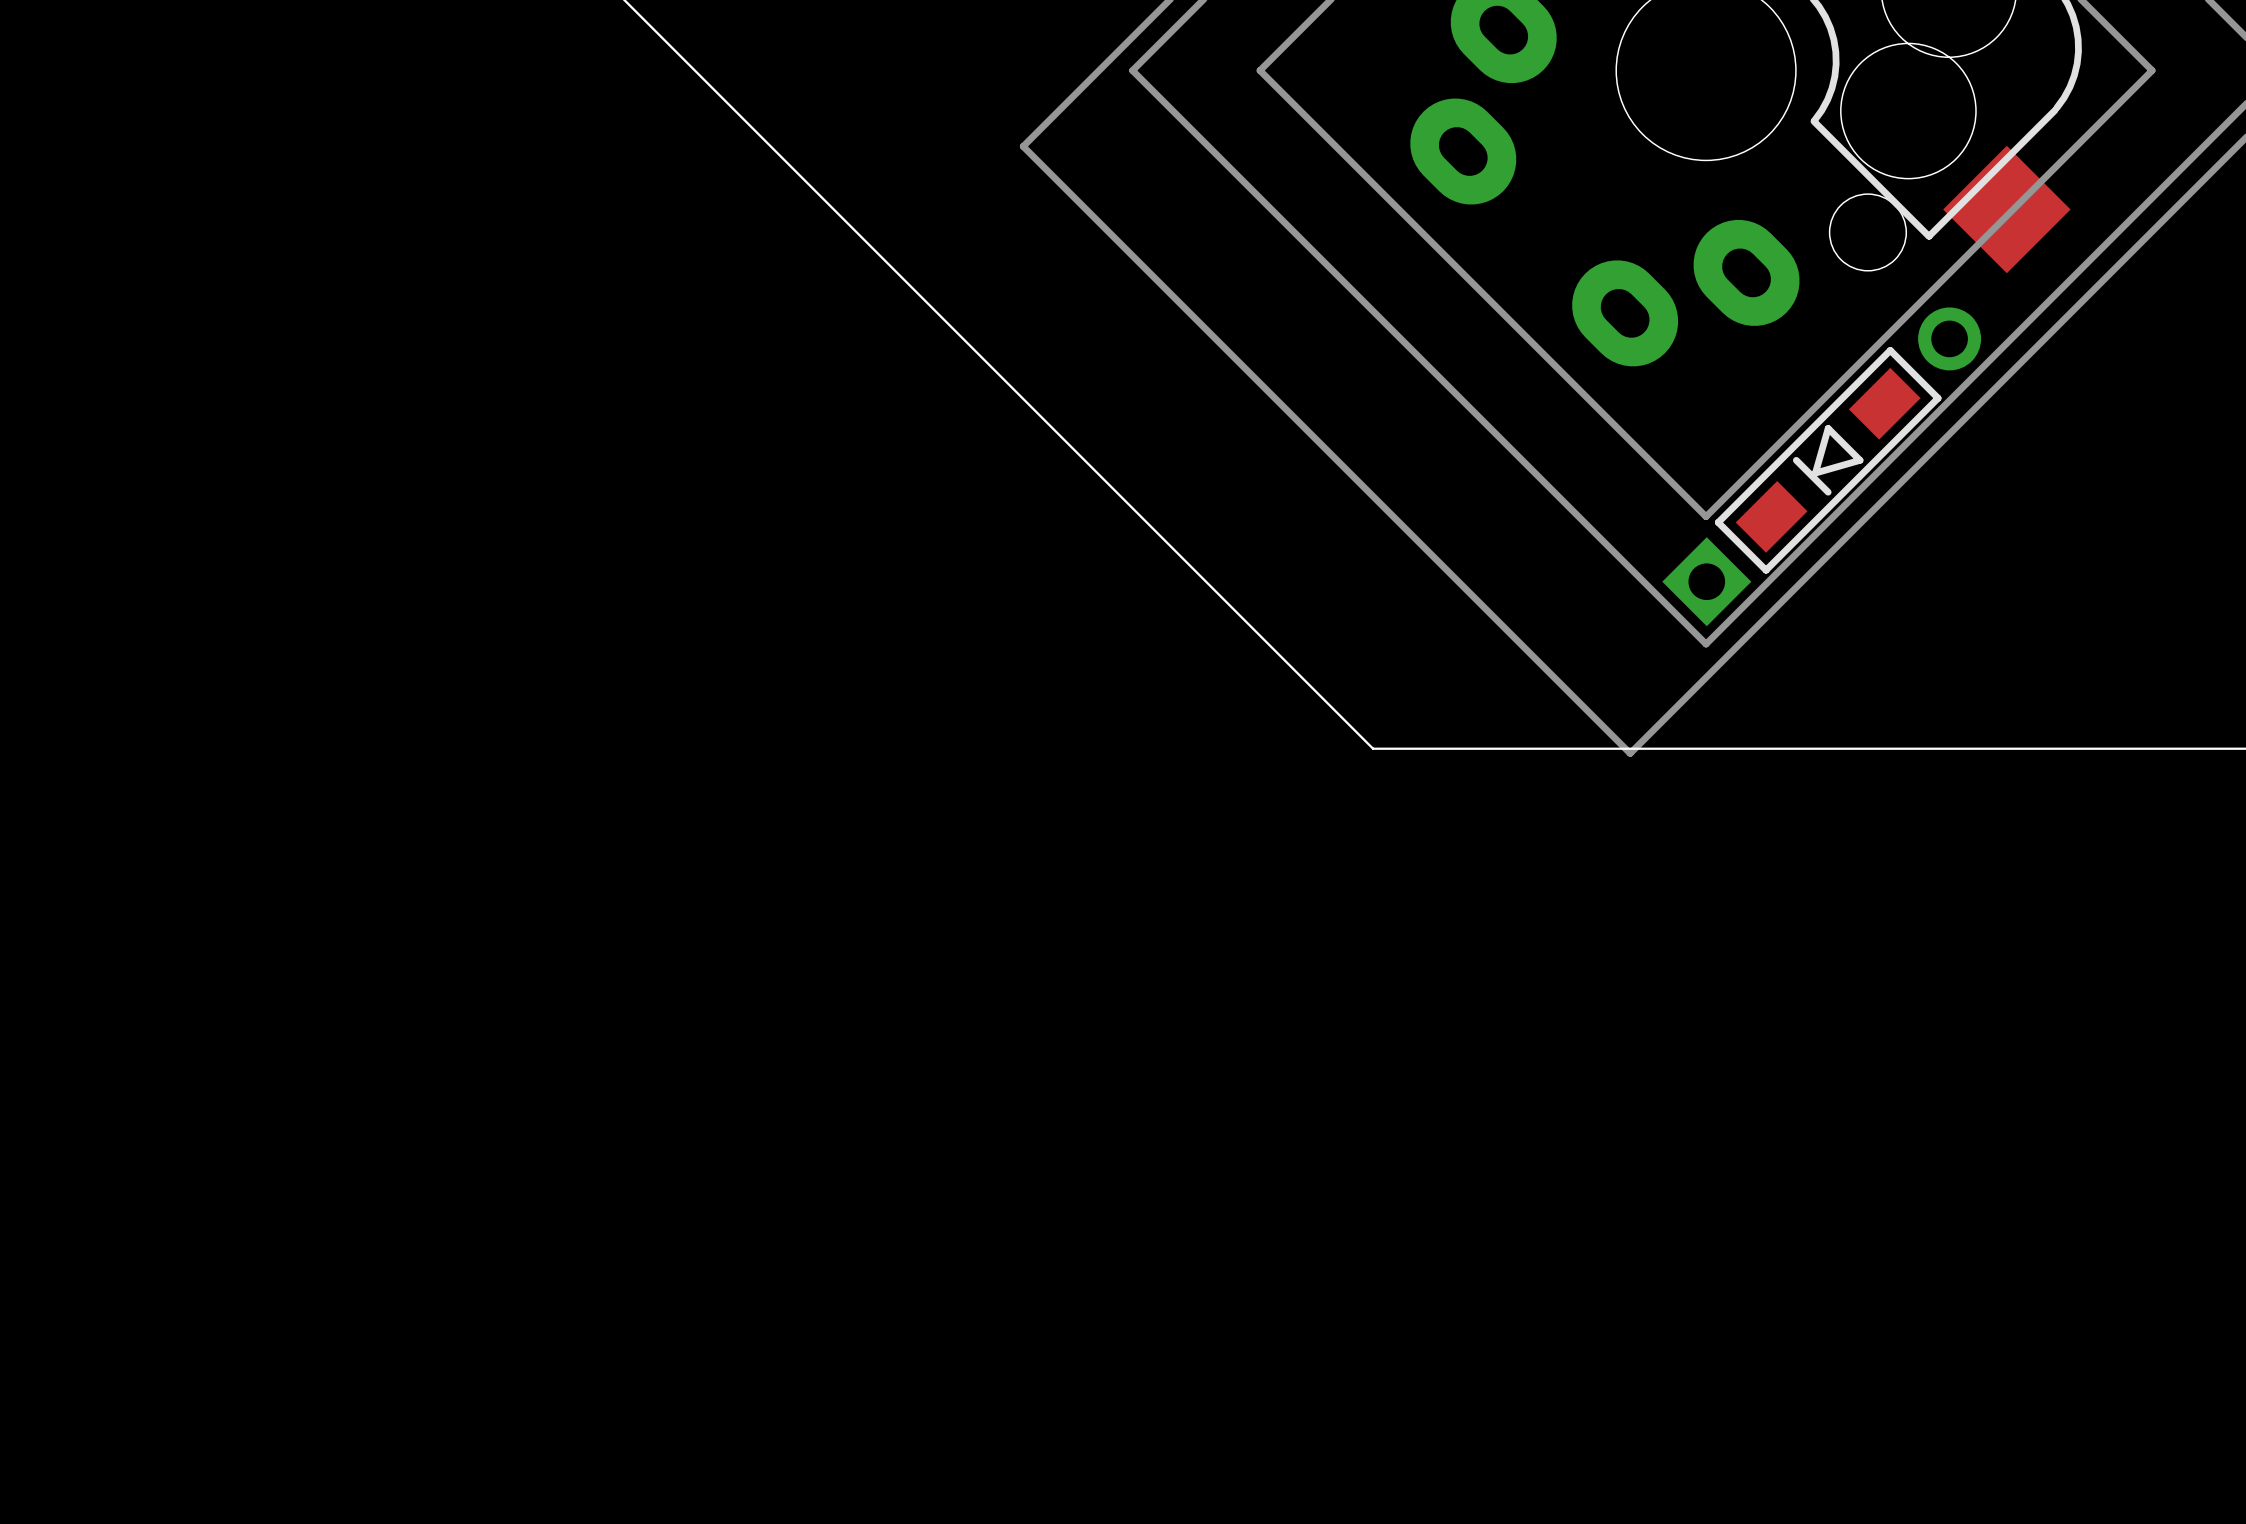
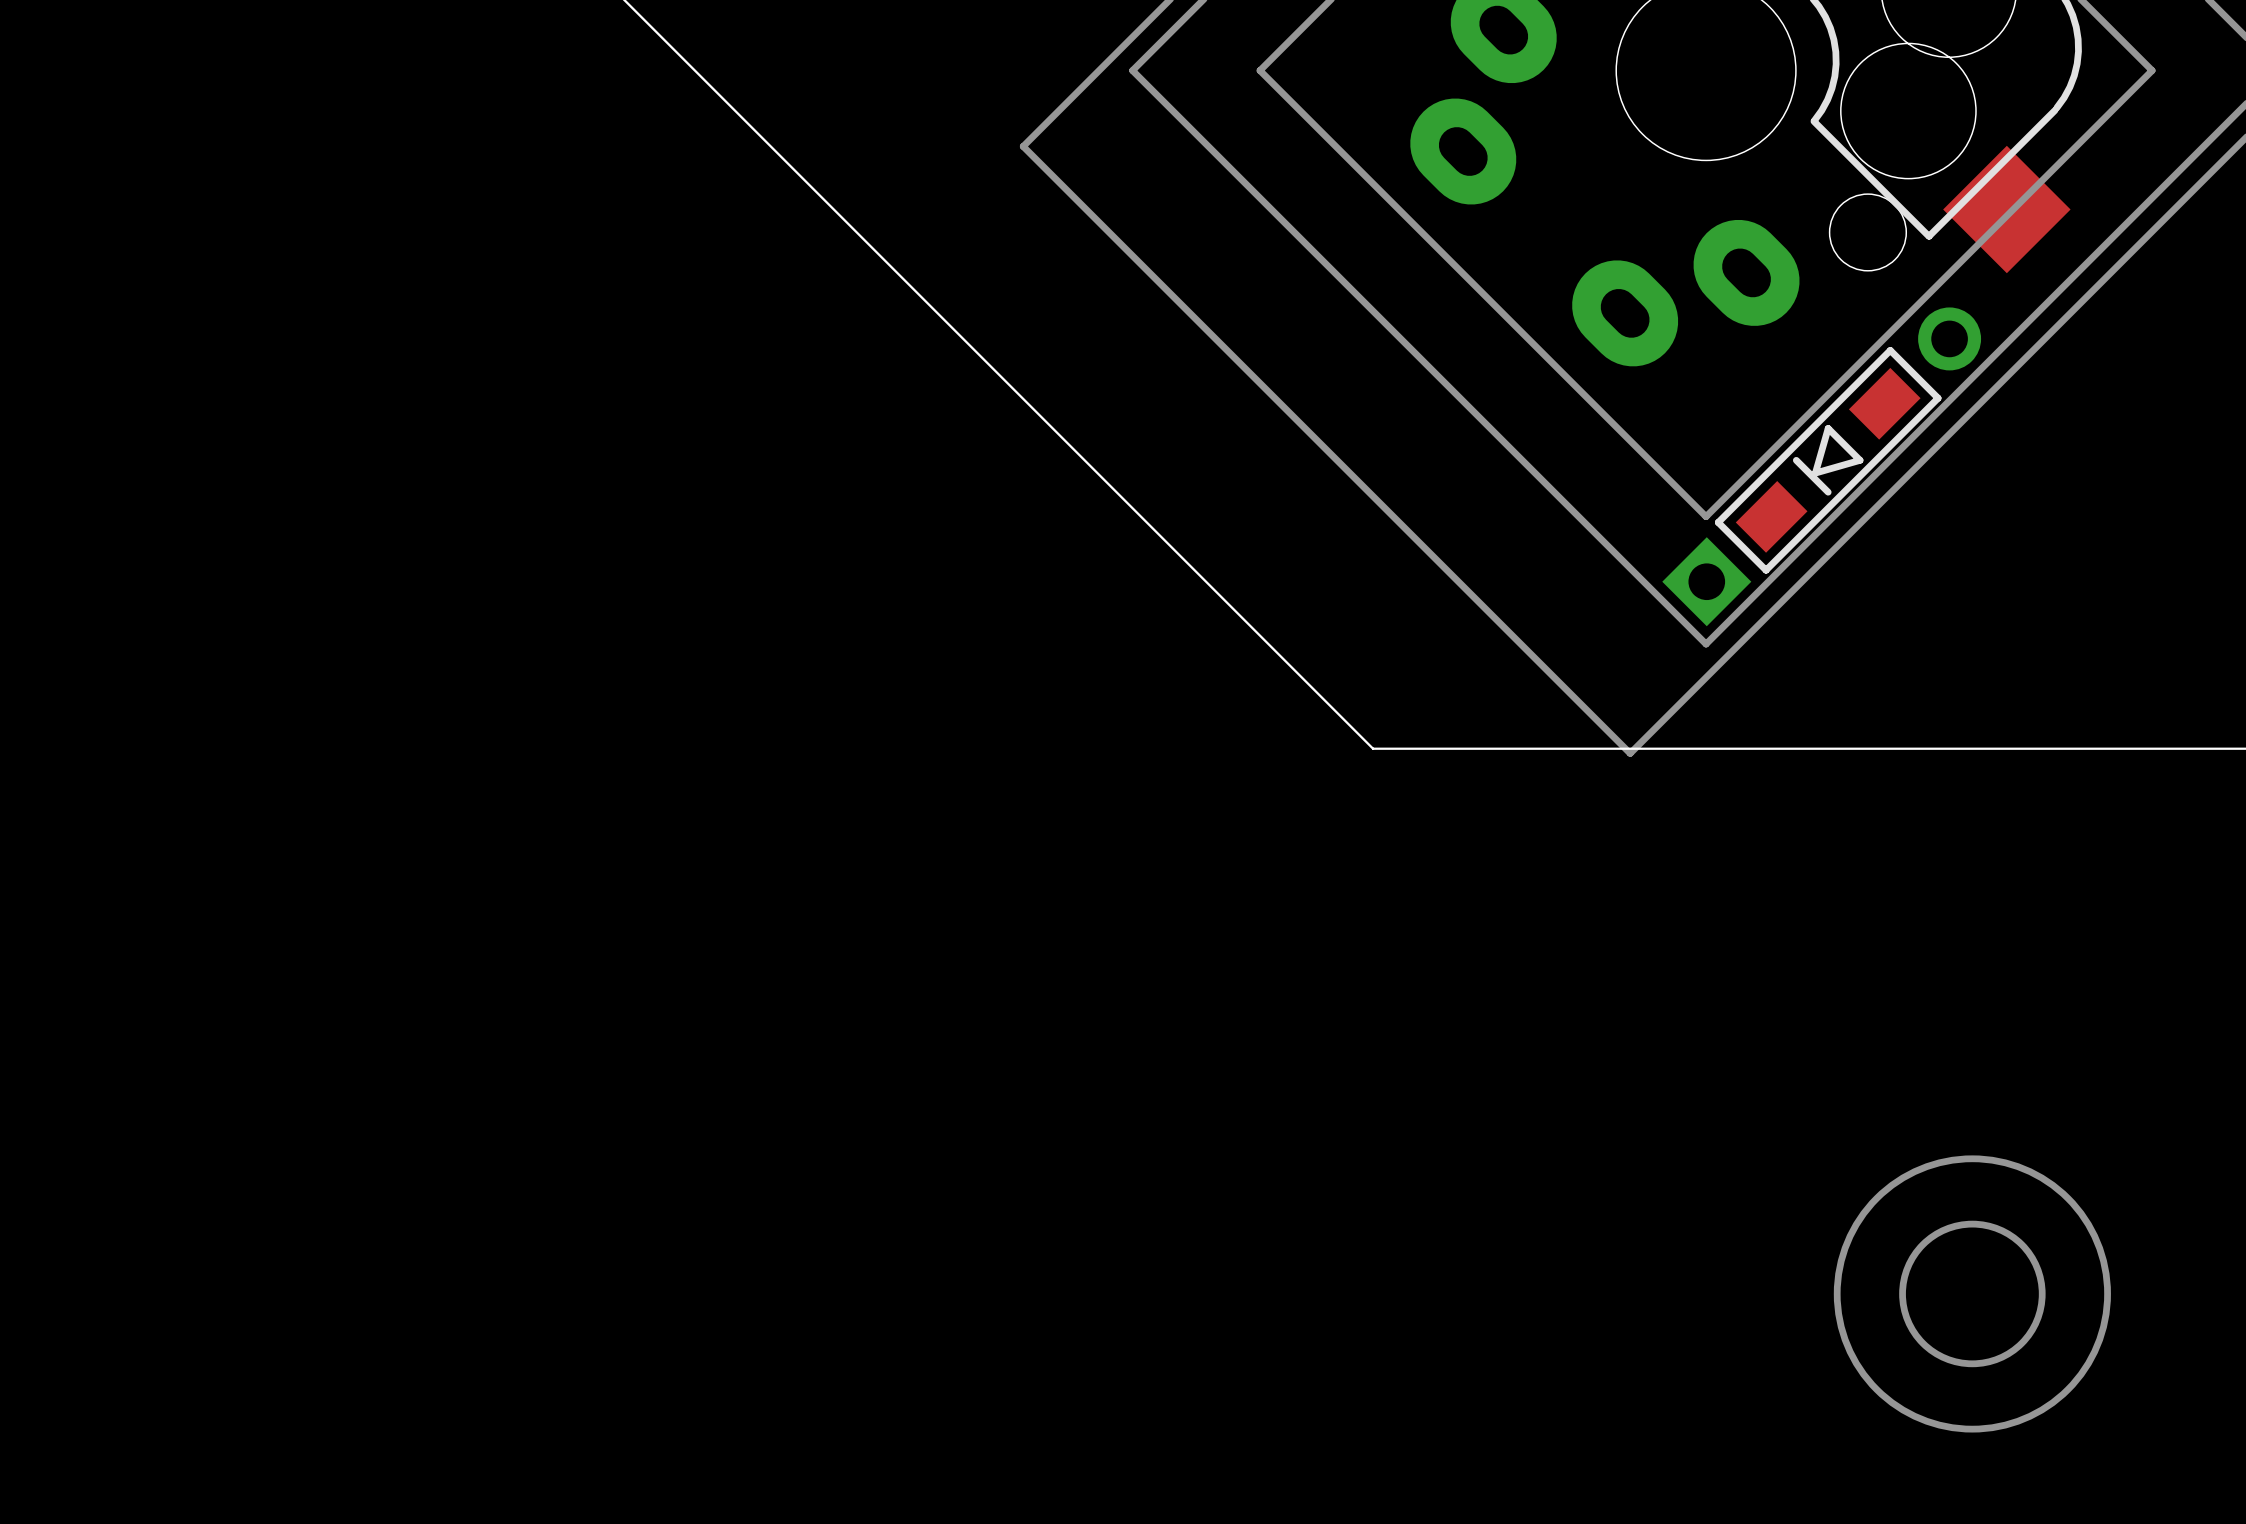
drawing: none -> [1833, 1155, 2111, 1433]

